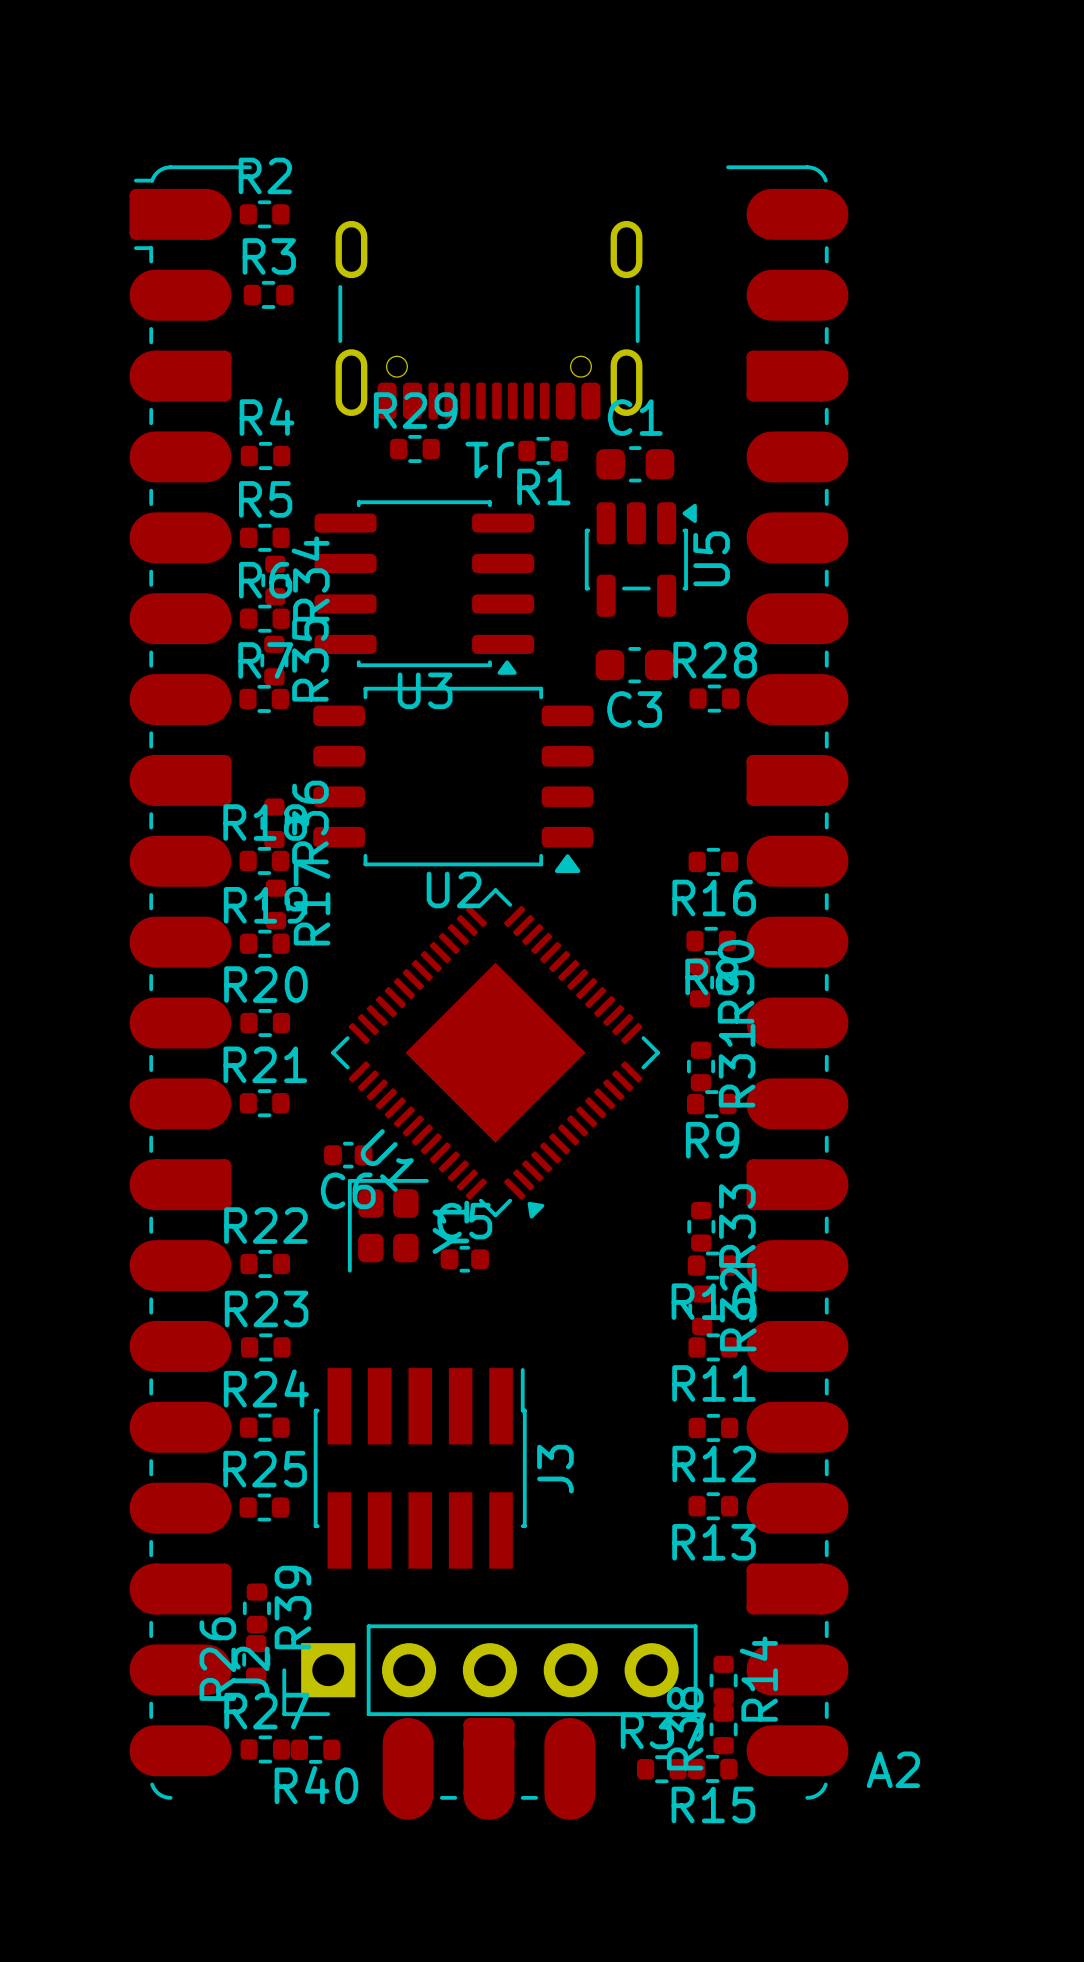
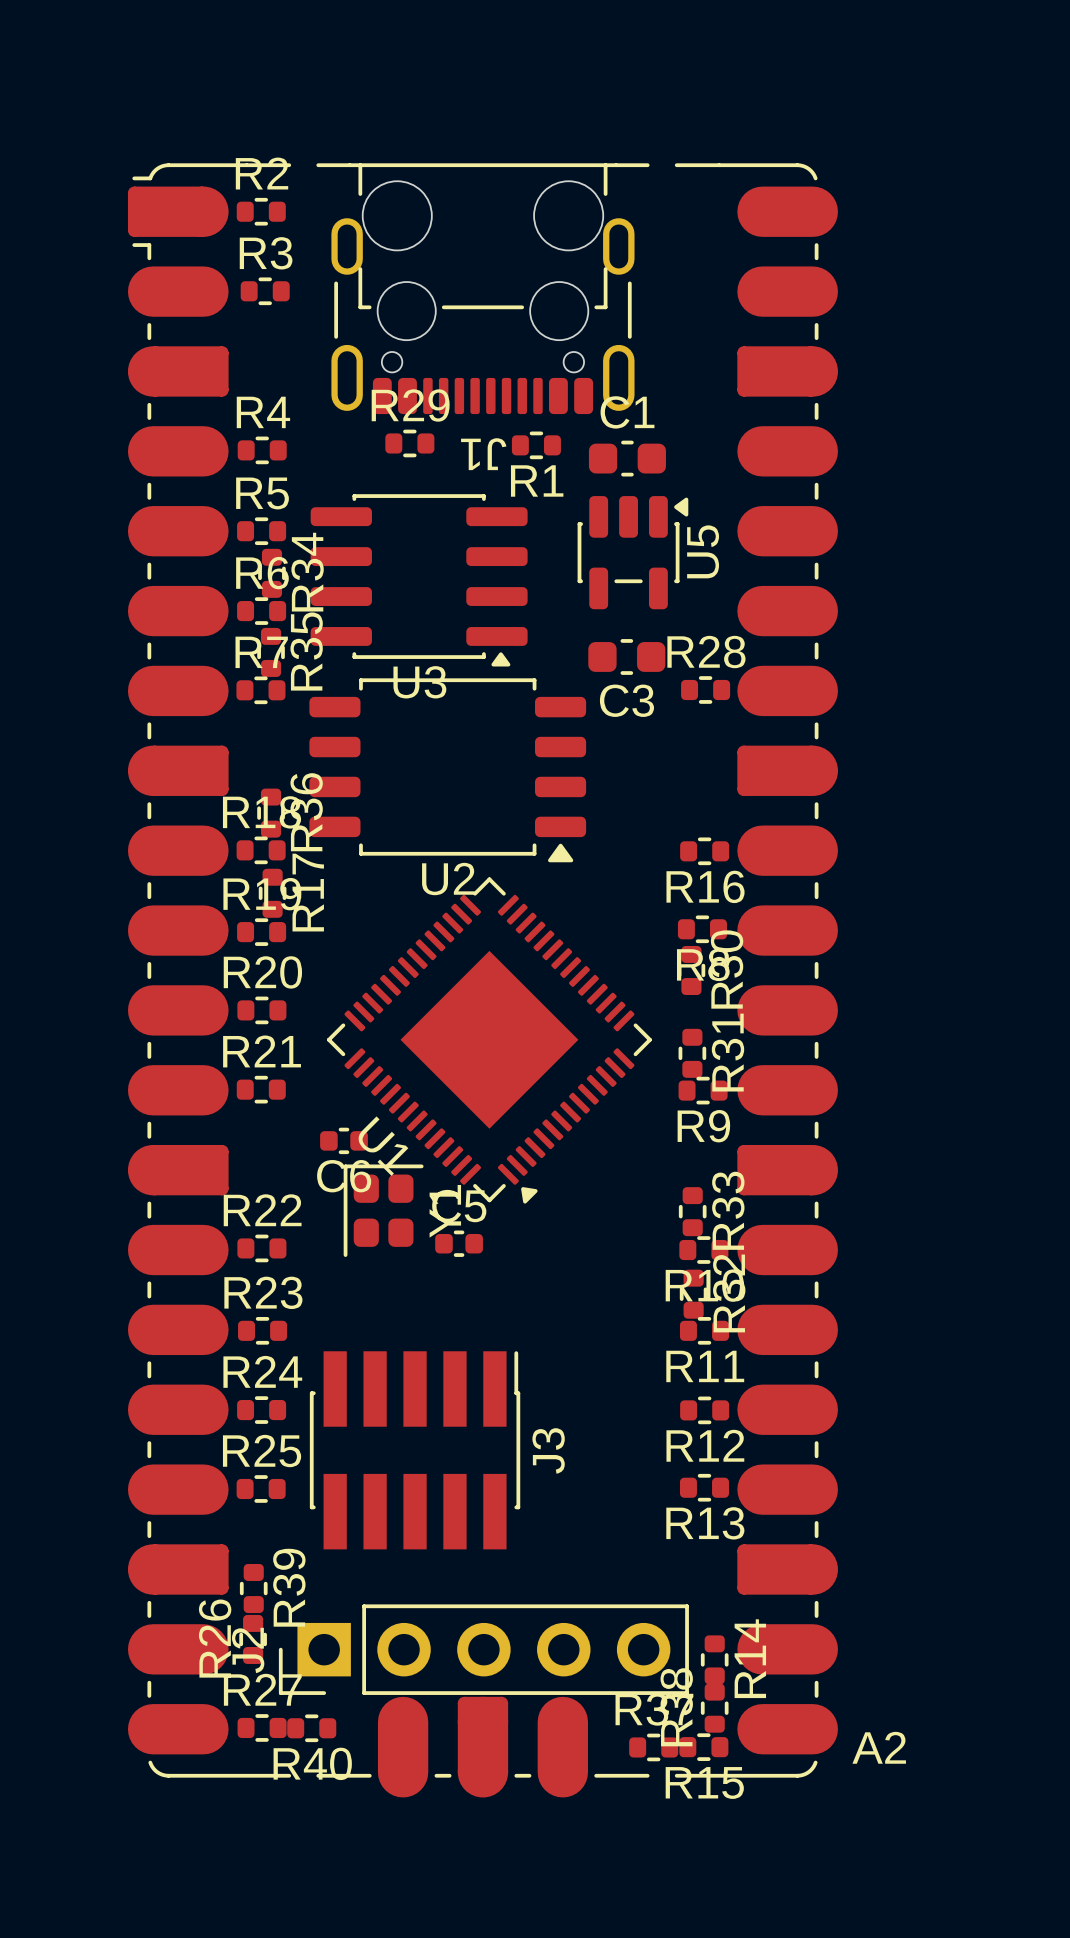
A2 footprint: [129, 165, 849, 1820] -> [127, 163, 838, 1798]

